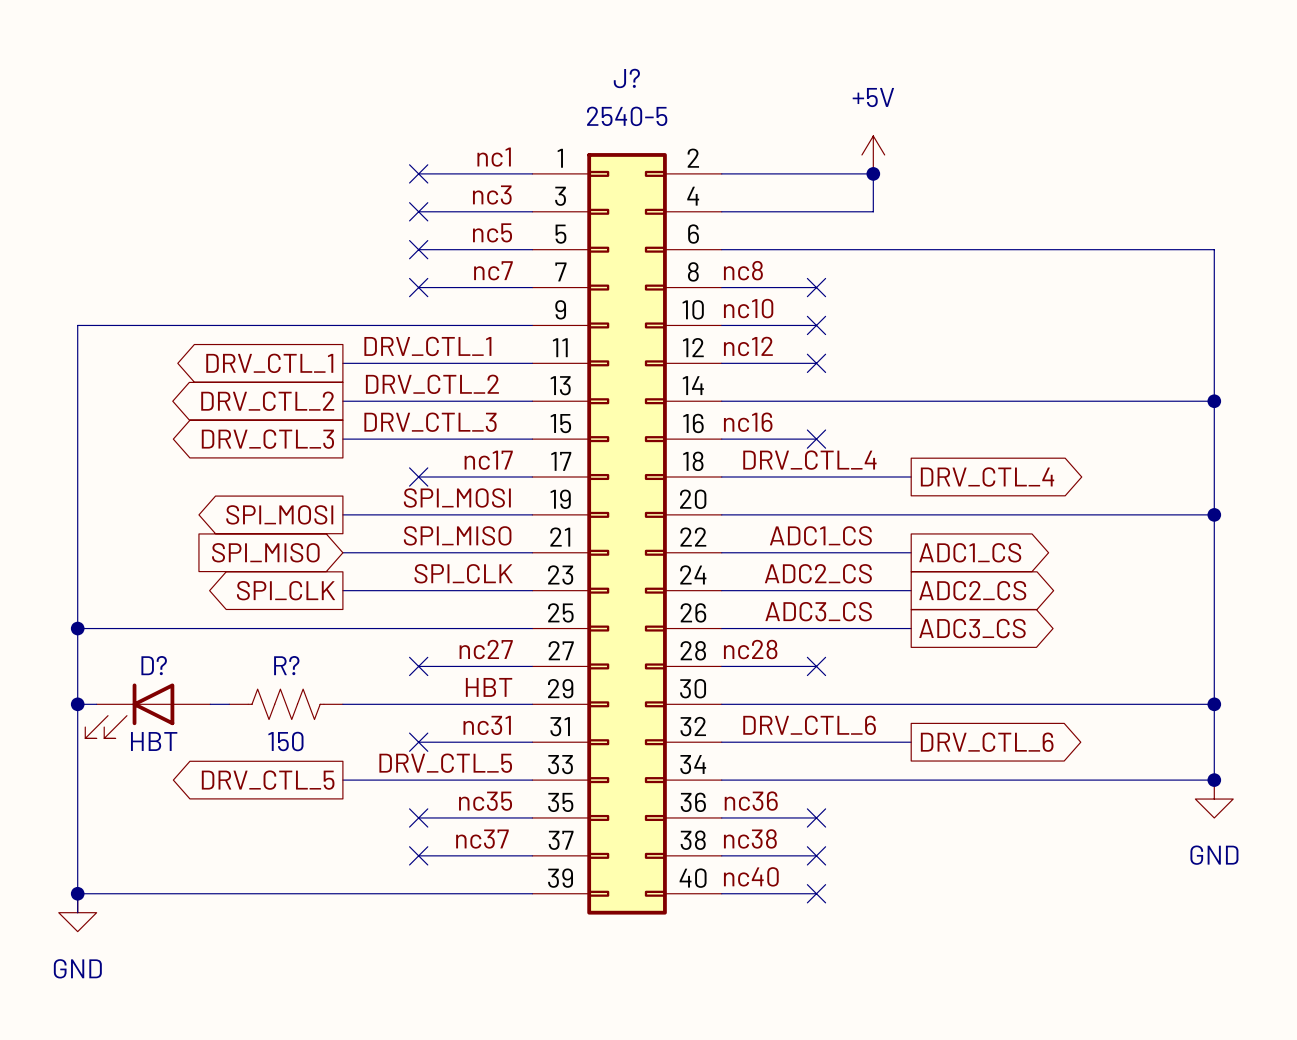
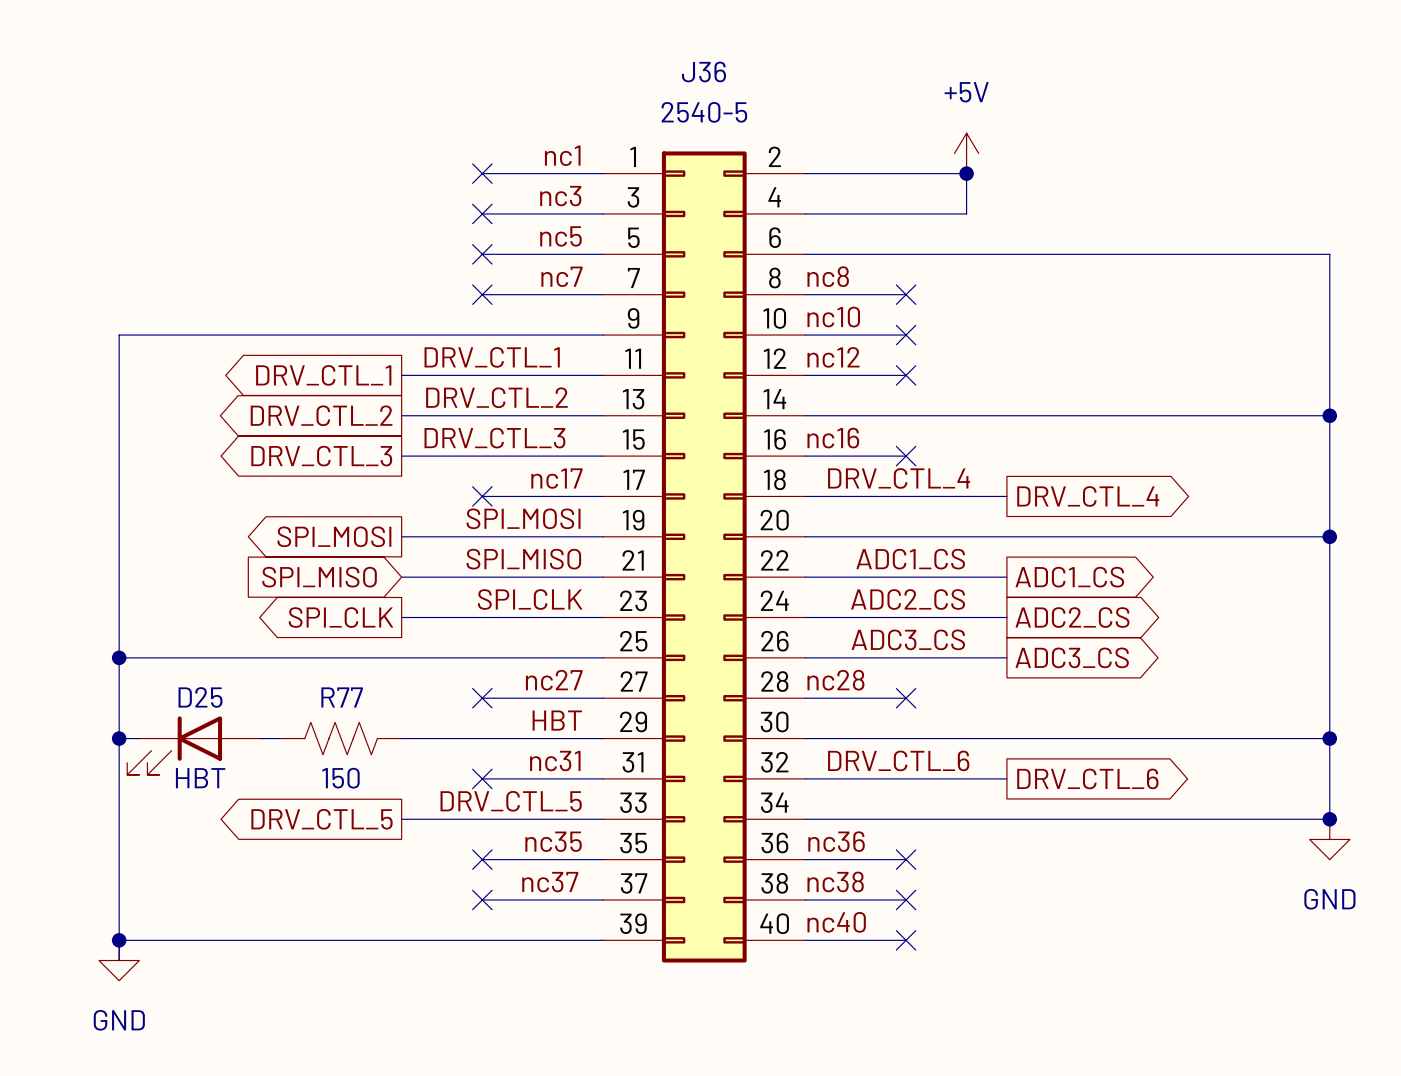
J? name: J? (626, 78) -> J36 (703, 71)
D? name: D? (154, 665) -> D25 (200, 697)
R? name: R? (286, 665) -> R77 (342, 697)

